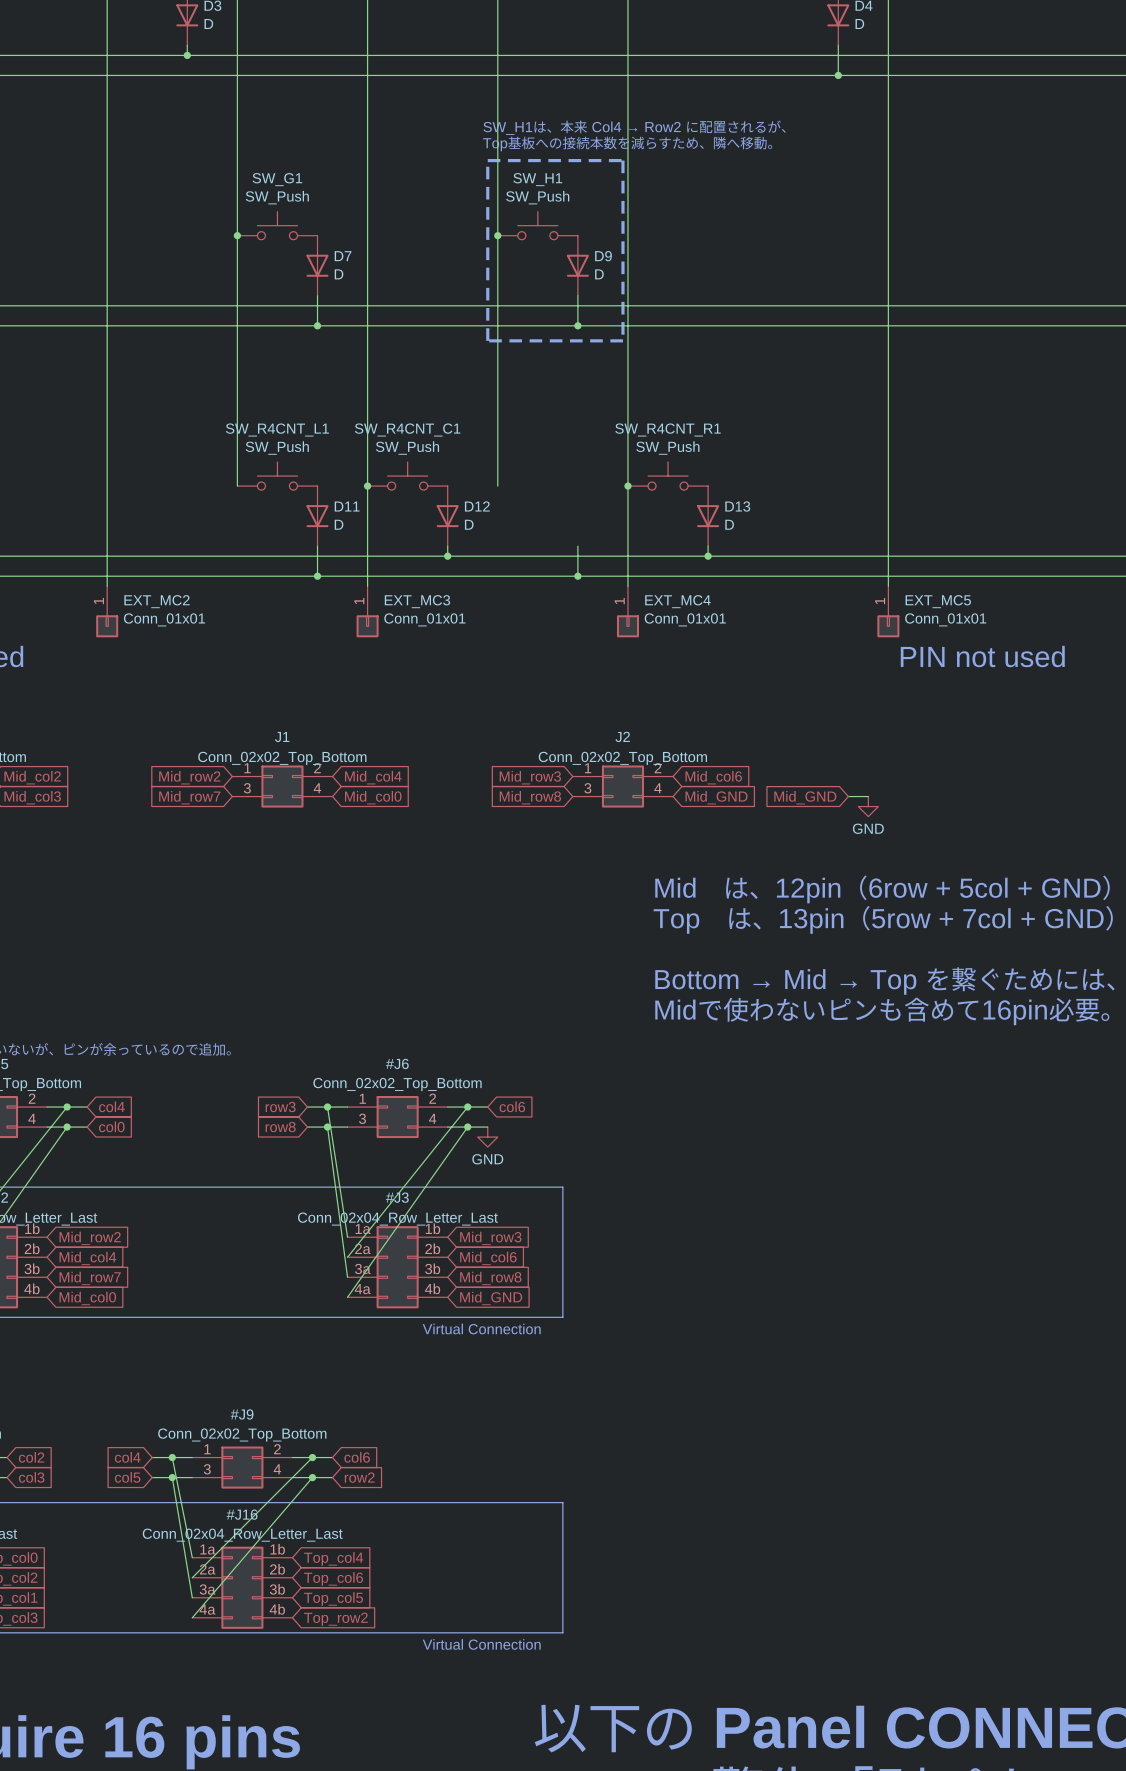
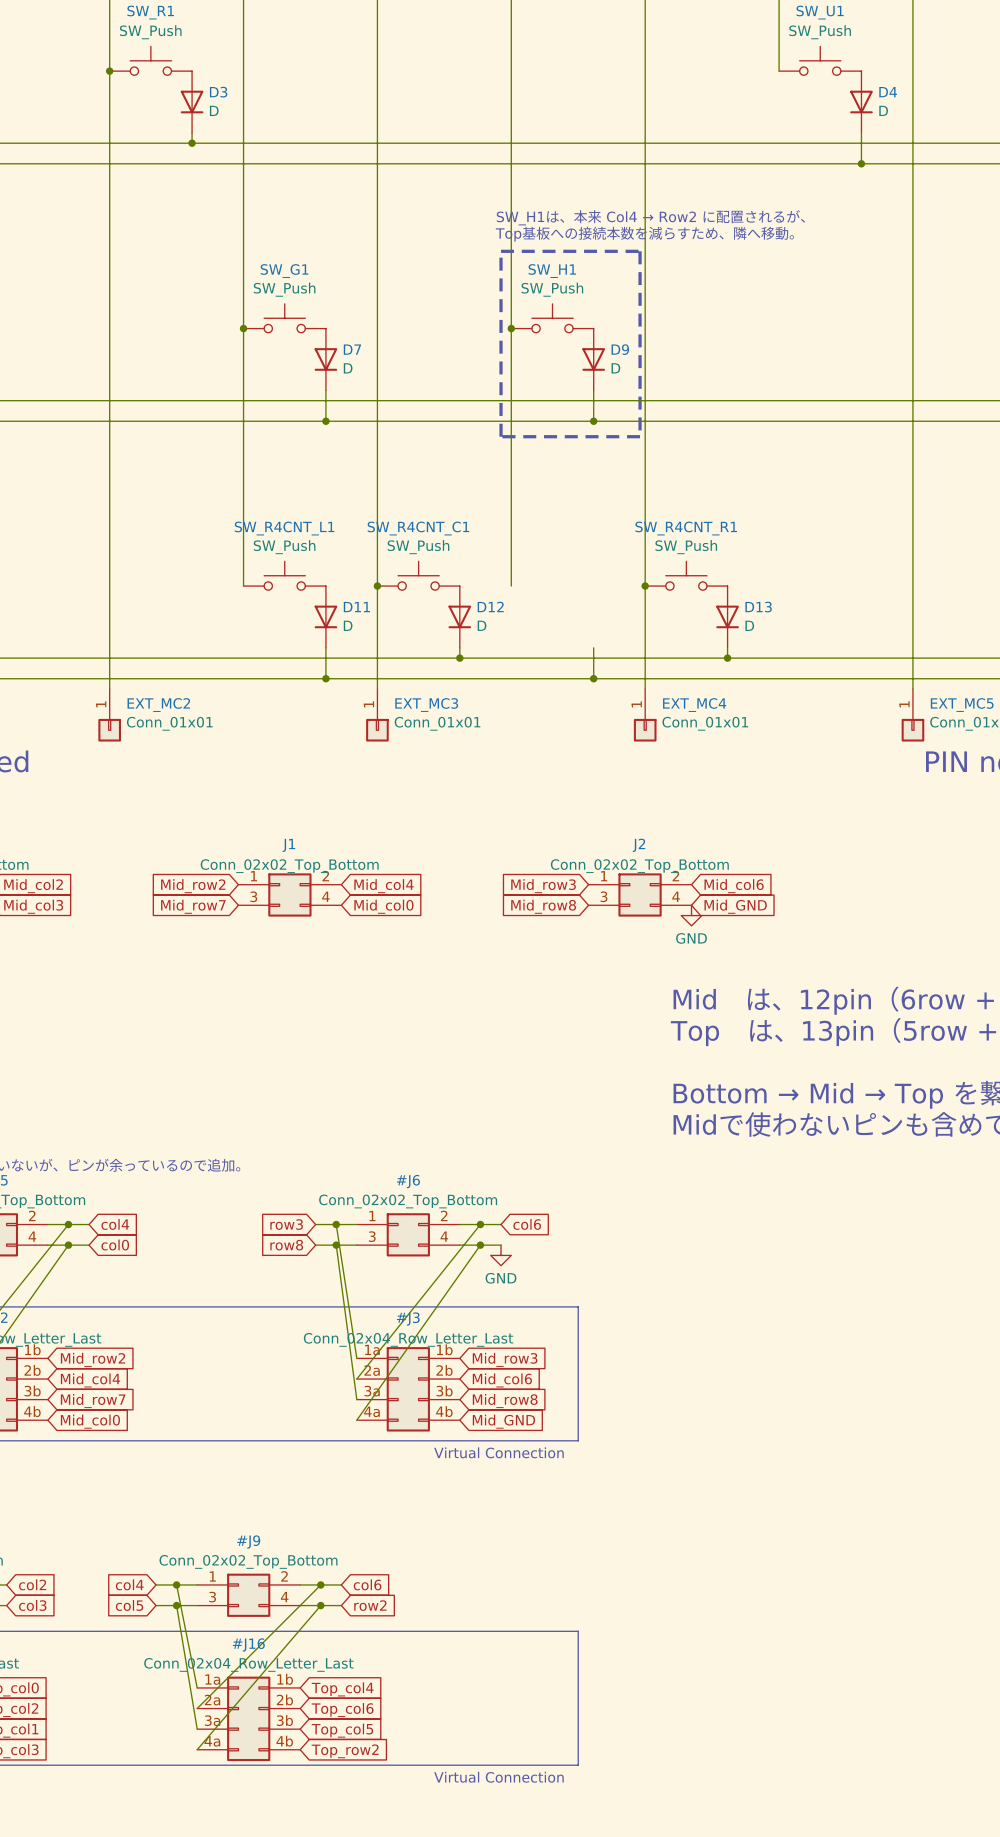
wire: (848, 796) (868, 796) -> none
global label: Mid_GND (805, 797) -> none
power symbol position: GND (868, 806) -> GND (691, 915)

